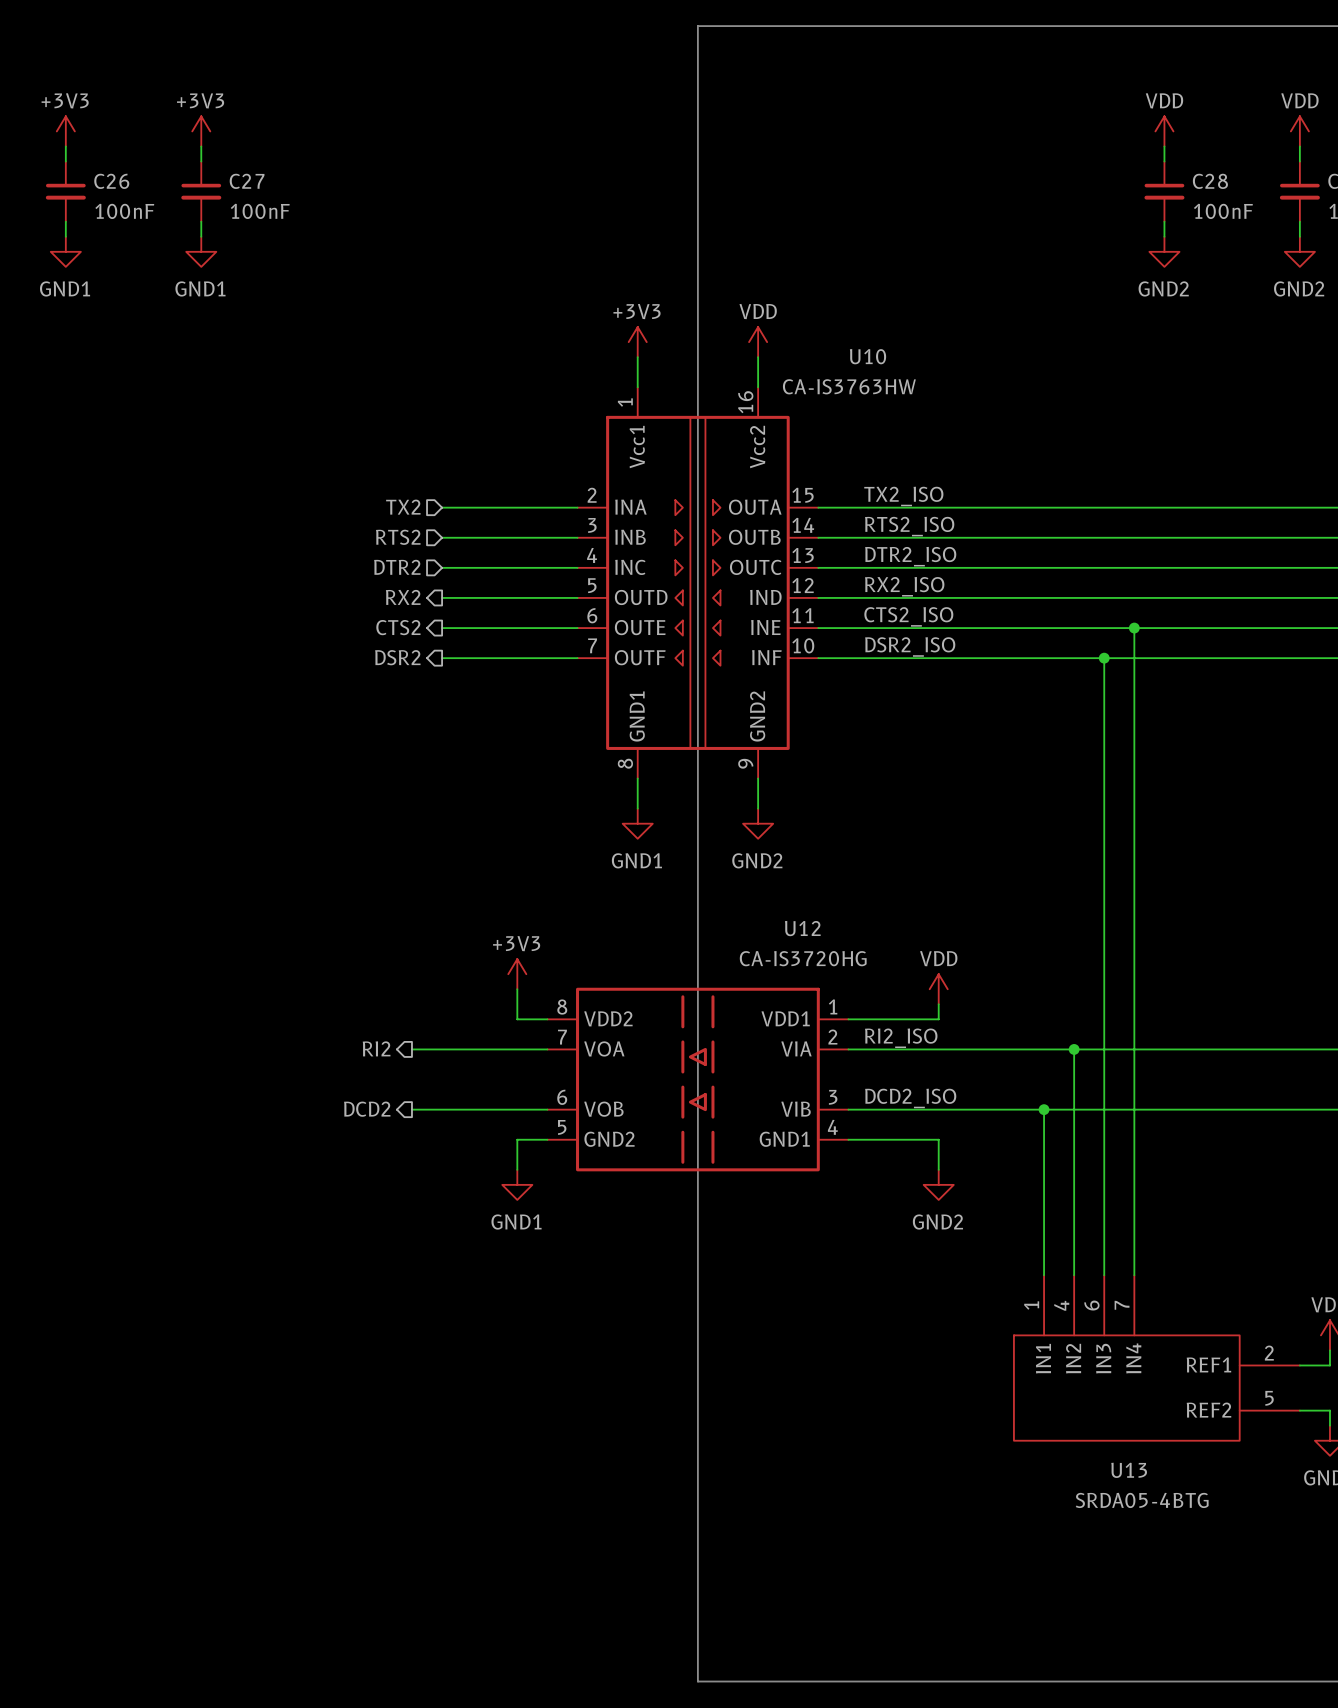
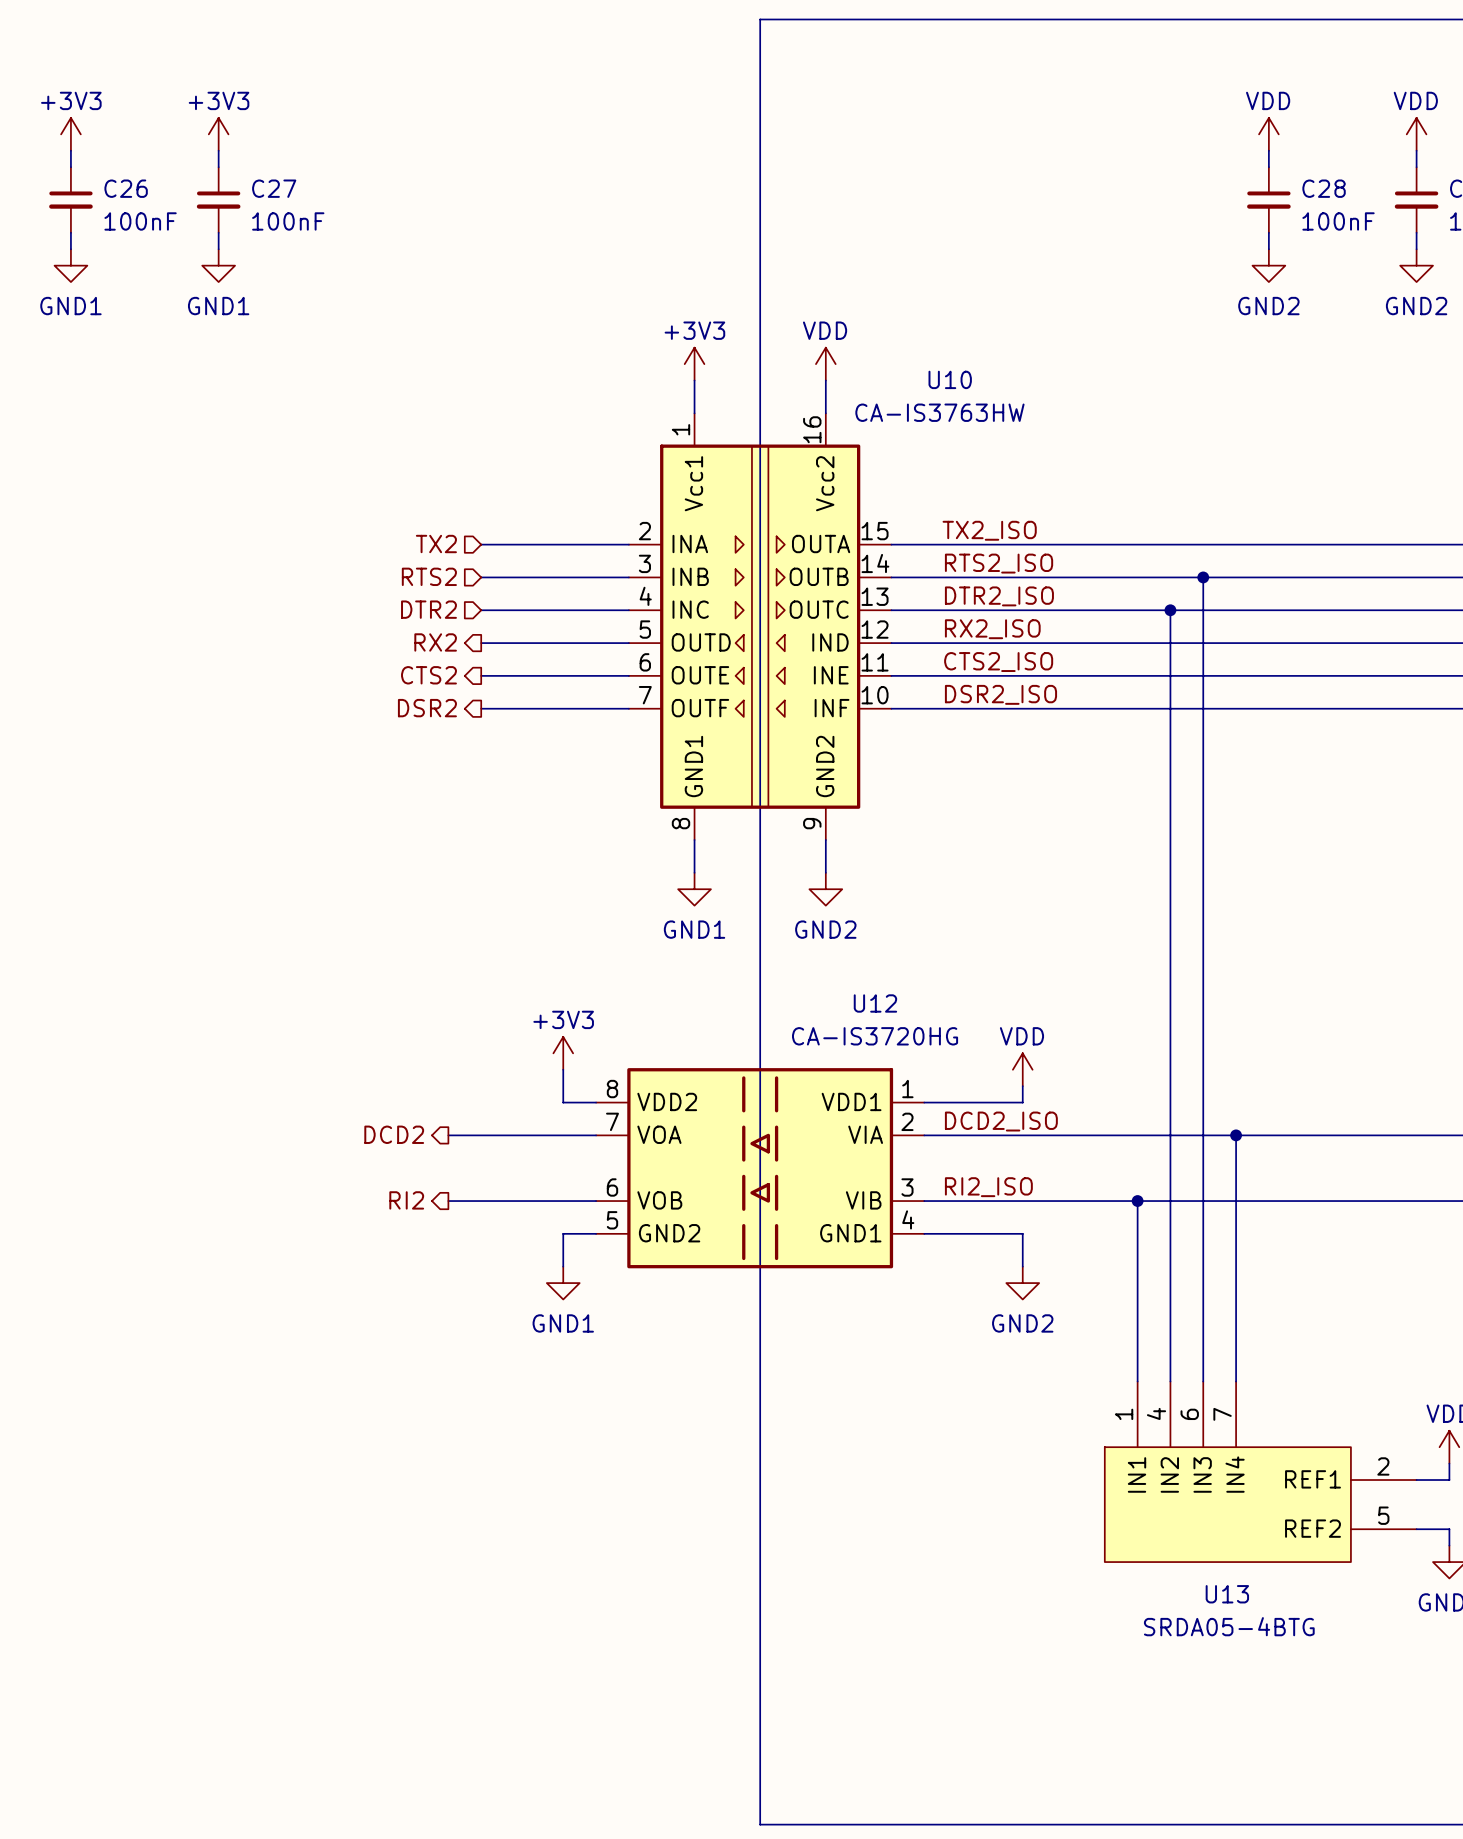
wire: none -> (1203, 577) (1203, 708)
junction: none -> (1203, 577)
wire: none -> (1170, 610) (1170, 1135)
junction: none -> (1170, 610)
wire: (1134, 628) (1134, 1049) -> none
junction: (1134, 628) -> none
junction: (1104, 658) -> none
label: RI2_ISO (901, 1038) -> DCD2_ISO (1001, 1121)
hierarchical label: RI2 (376, 1048) -> DCD2 (394, 1134)
junction position: (1074, 1049) -> (1236, 1135)
label: DCD2_ISO (910, 1098) -> RI2_ISO (988, 1187)
hierarchical label: DCD2 (367, 1109) -> RI2 (406, 1200)

